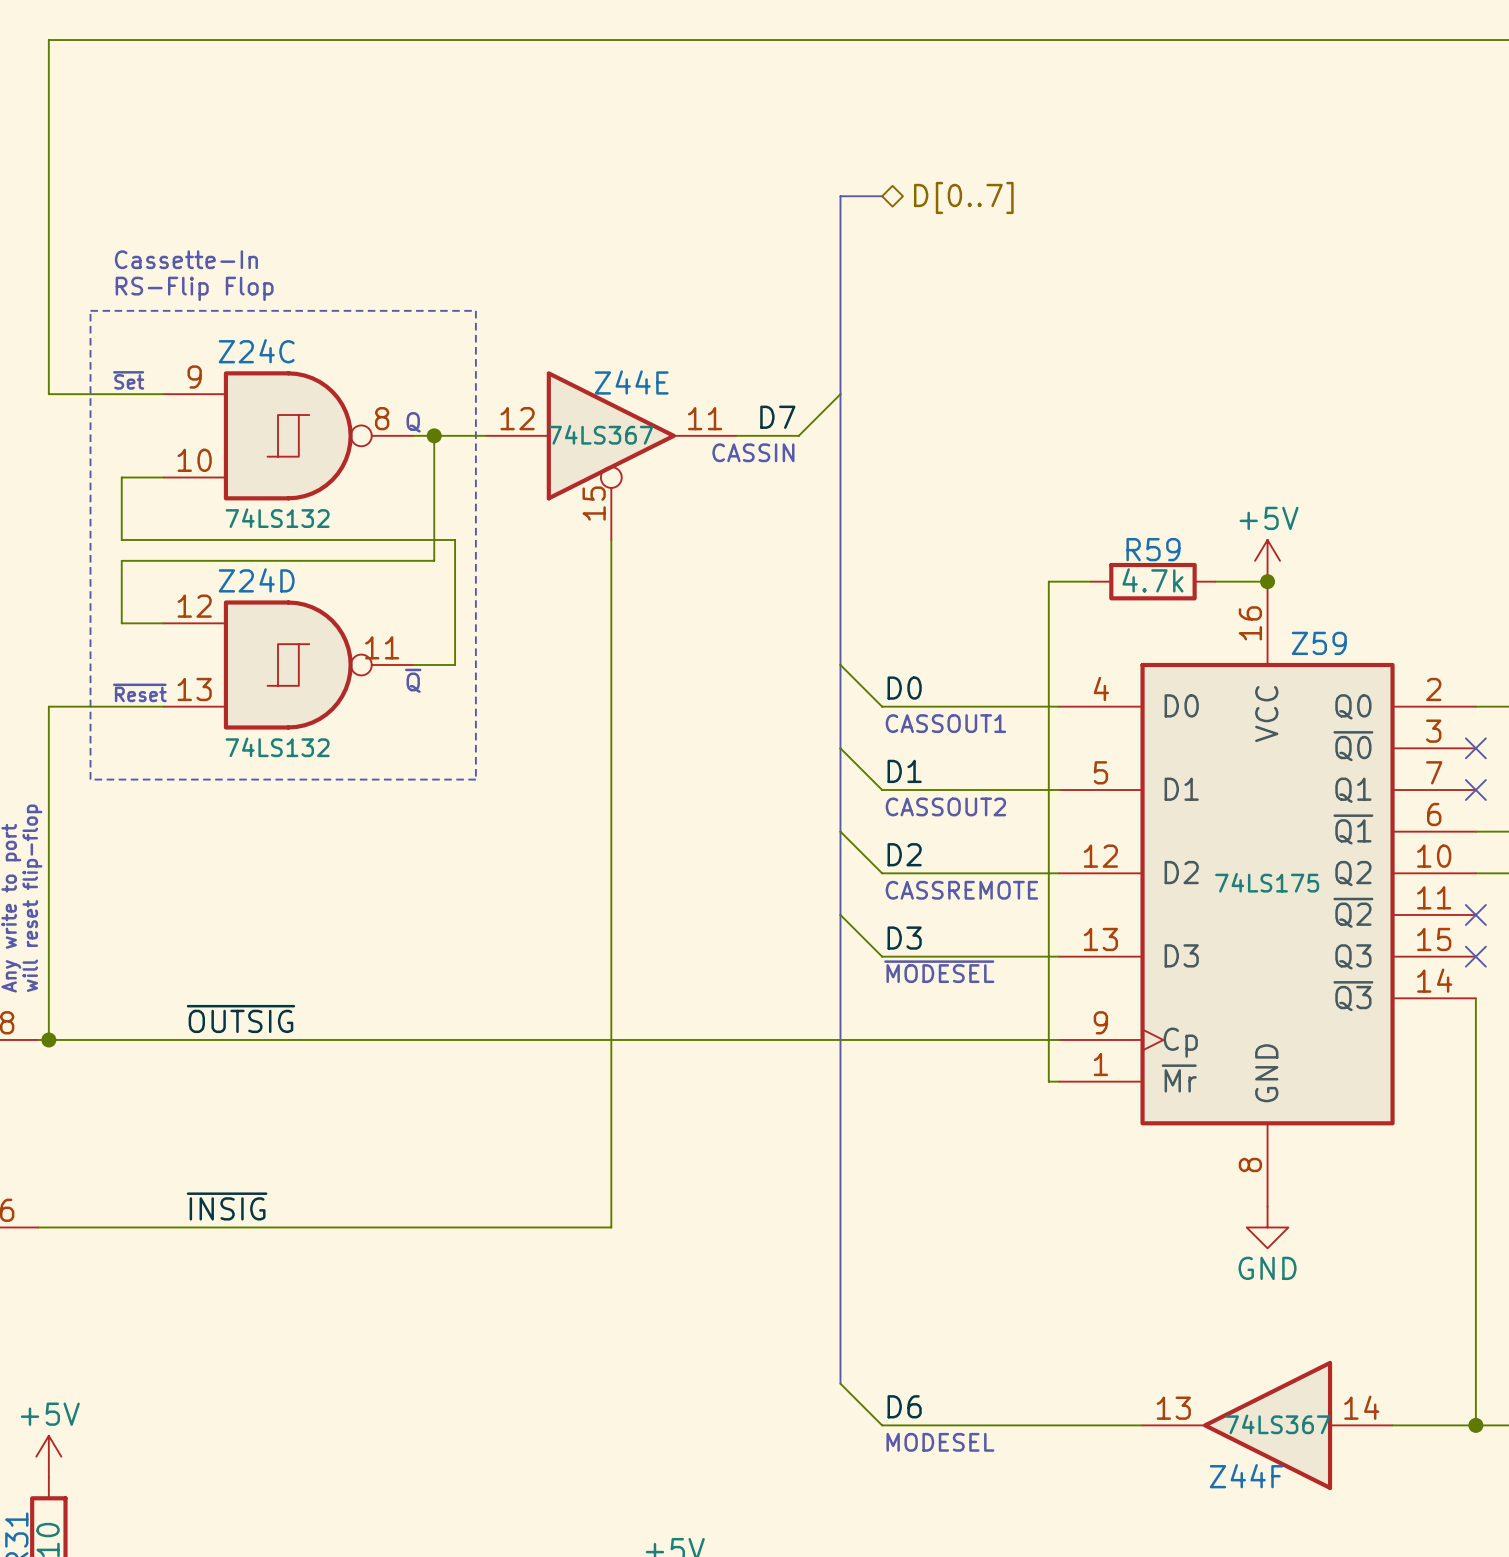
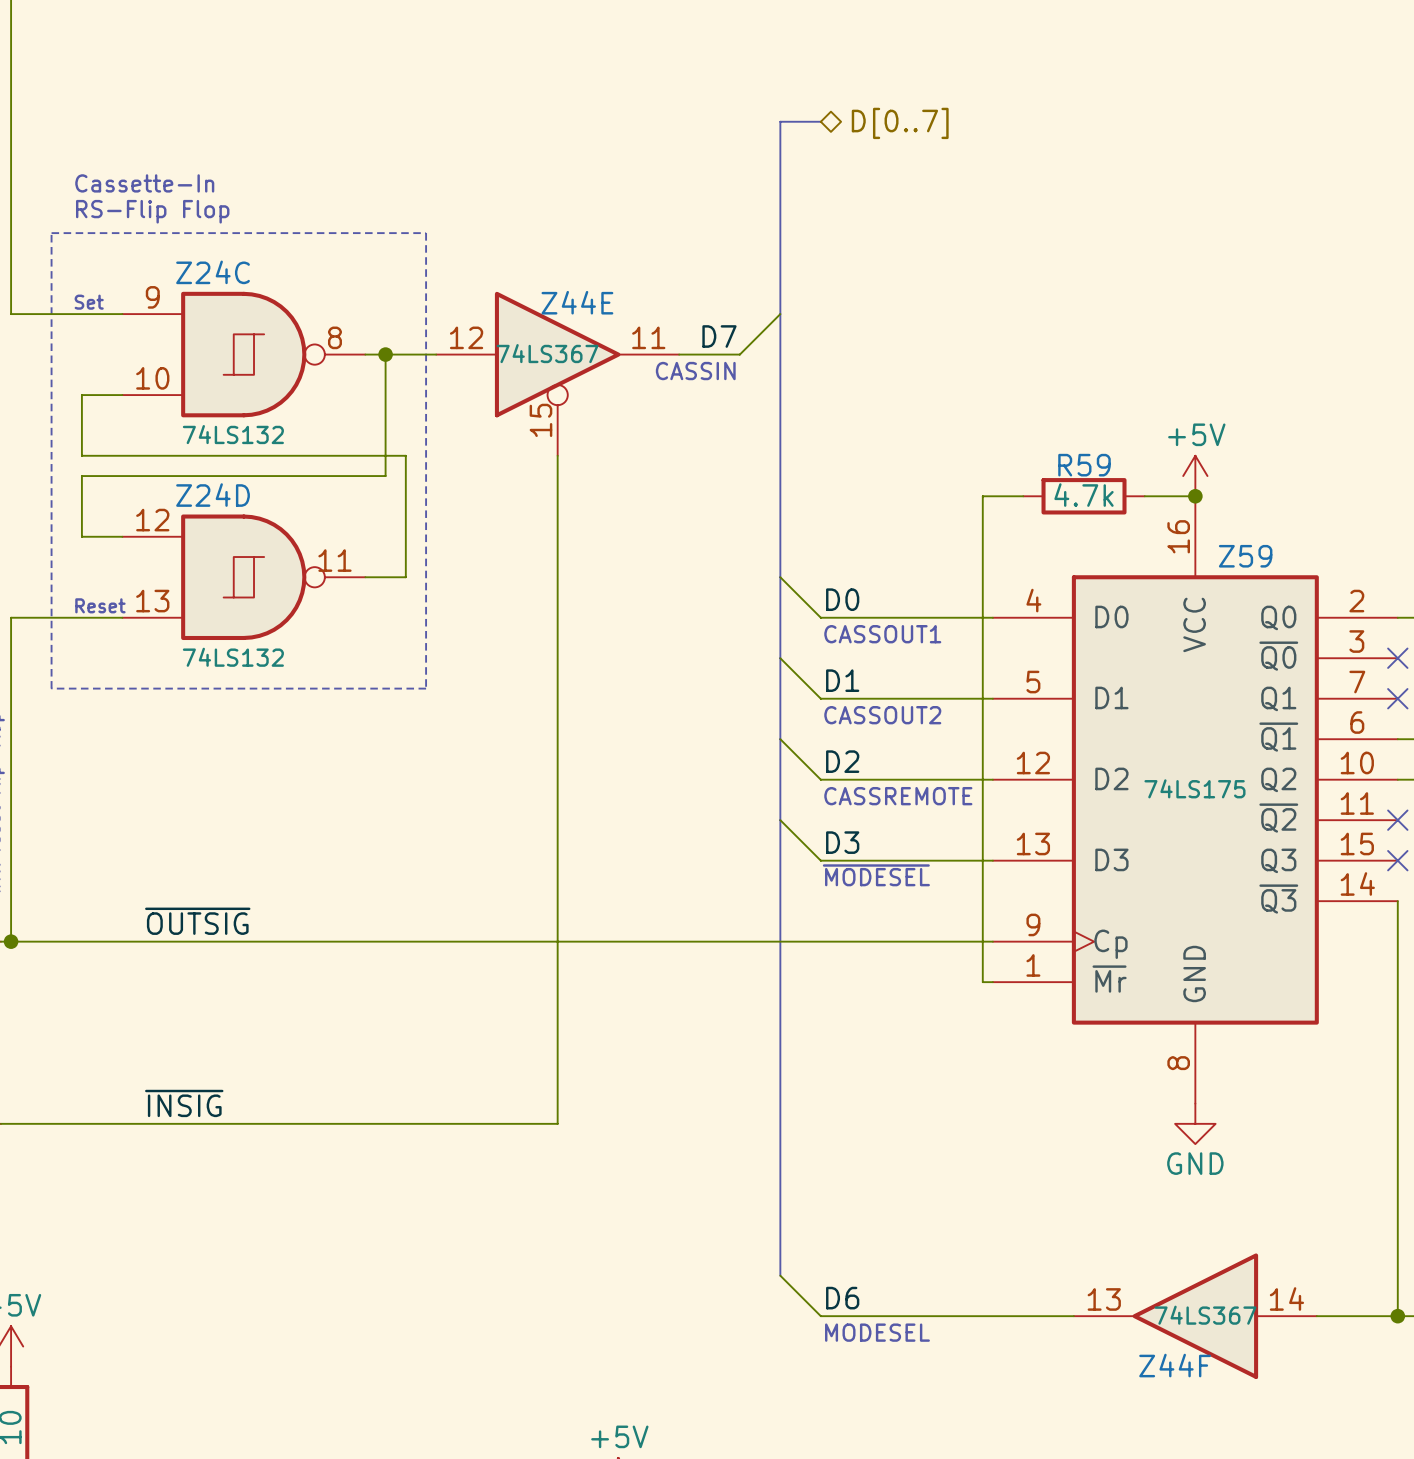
text: ~{Set} (128, 380) -> Set (89, 302)
text: Q (413, 422) -> none
text: ~{Q} (413, 680) -> none
text: ~{Reset} (139, 692) -> Reset (100, 605)

